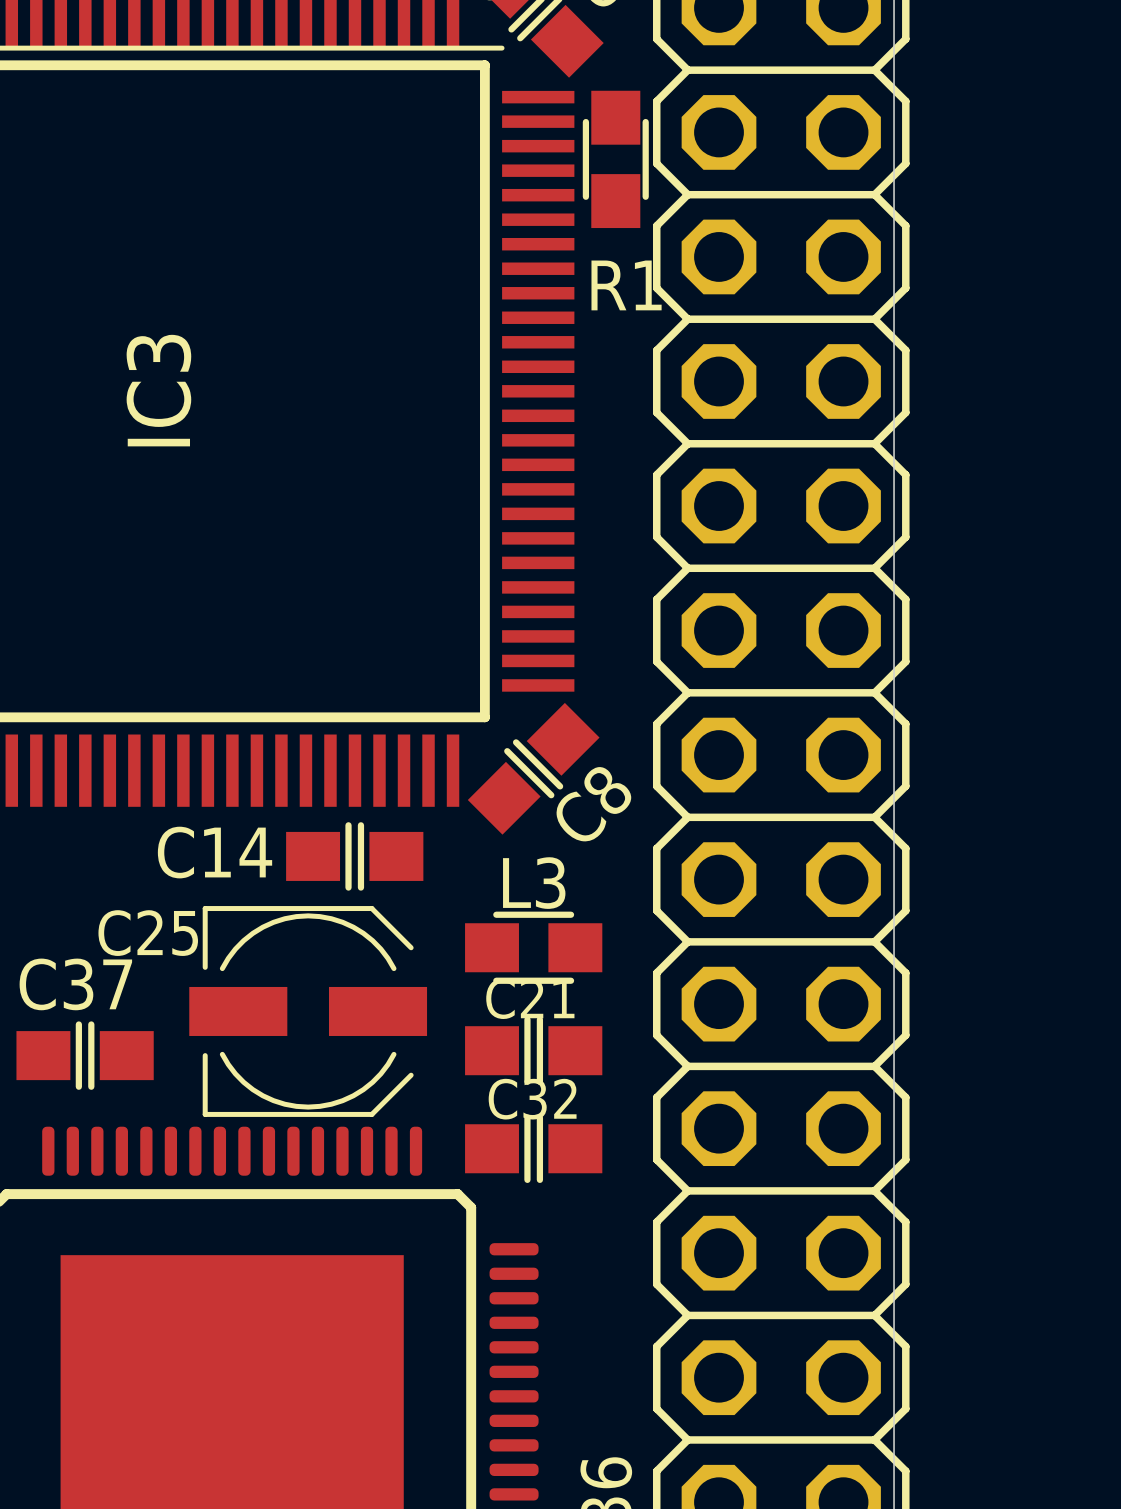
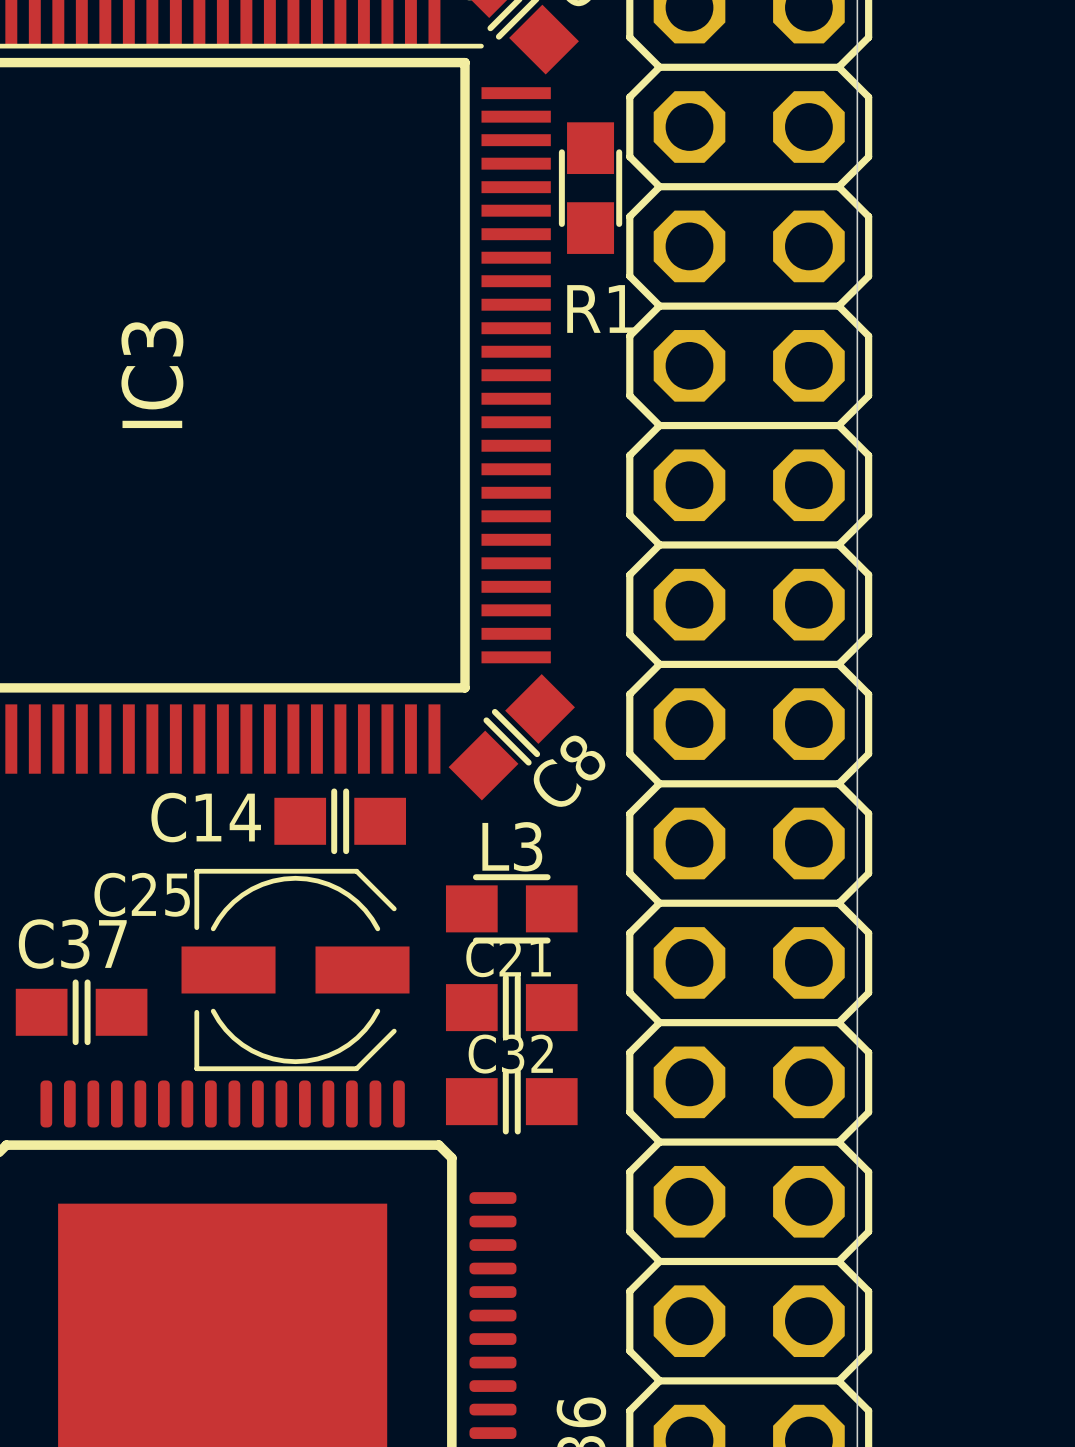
R1 position: (615, 159) -> (590, 188)

